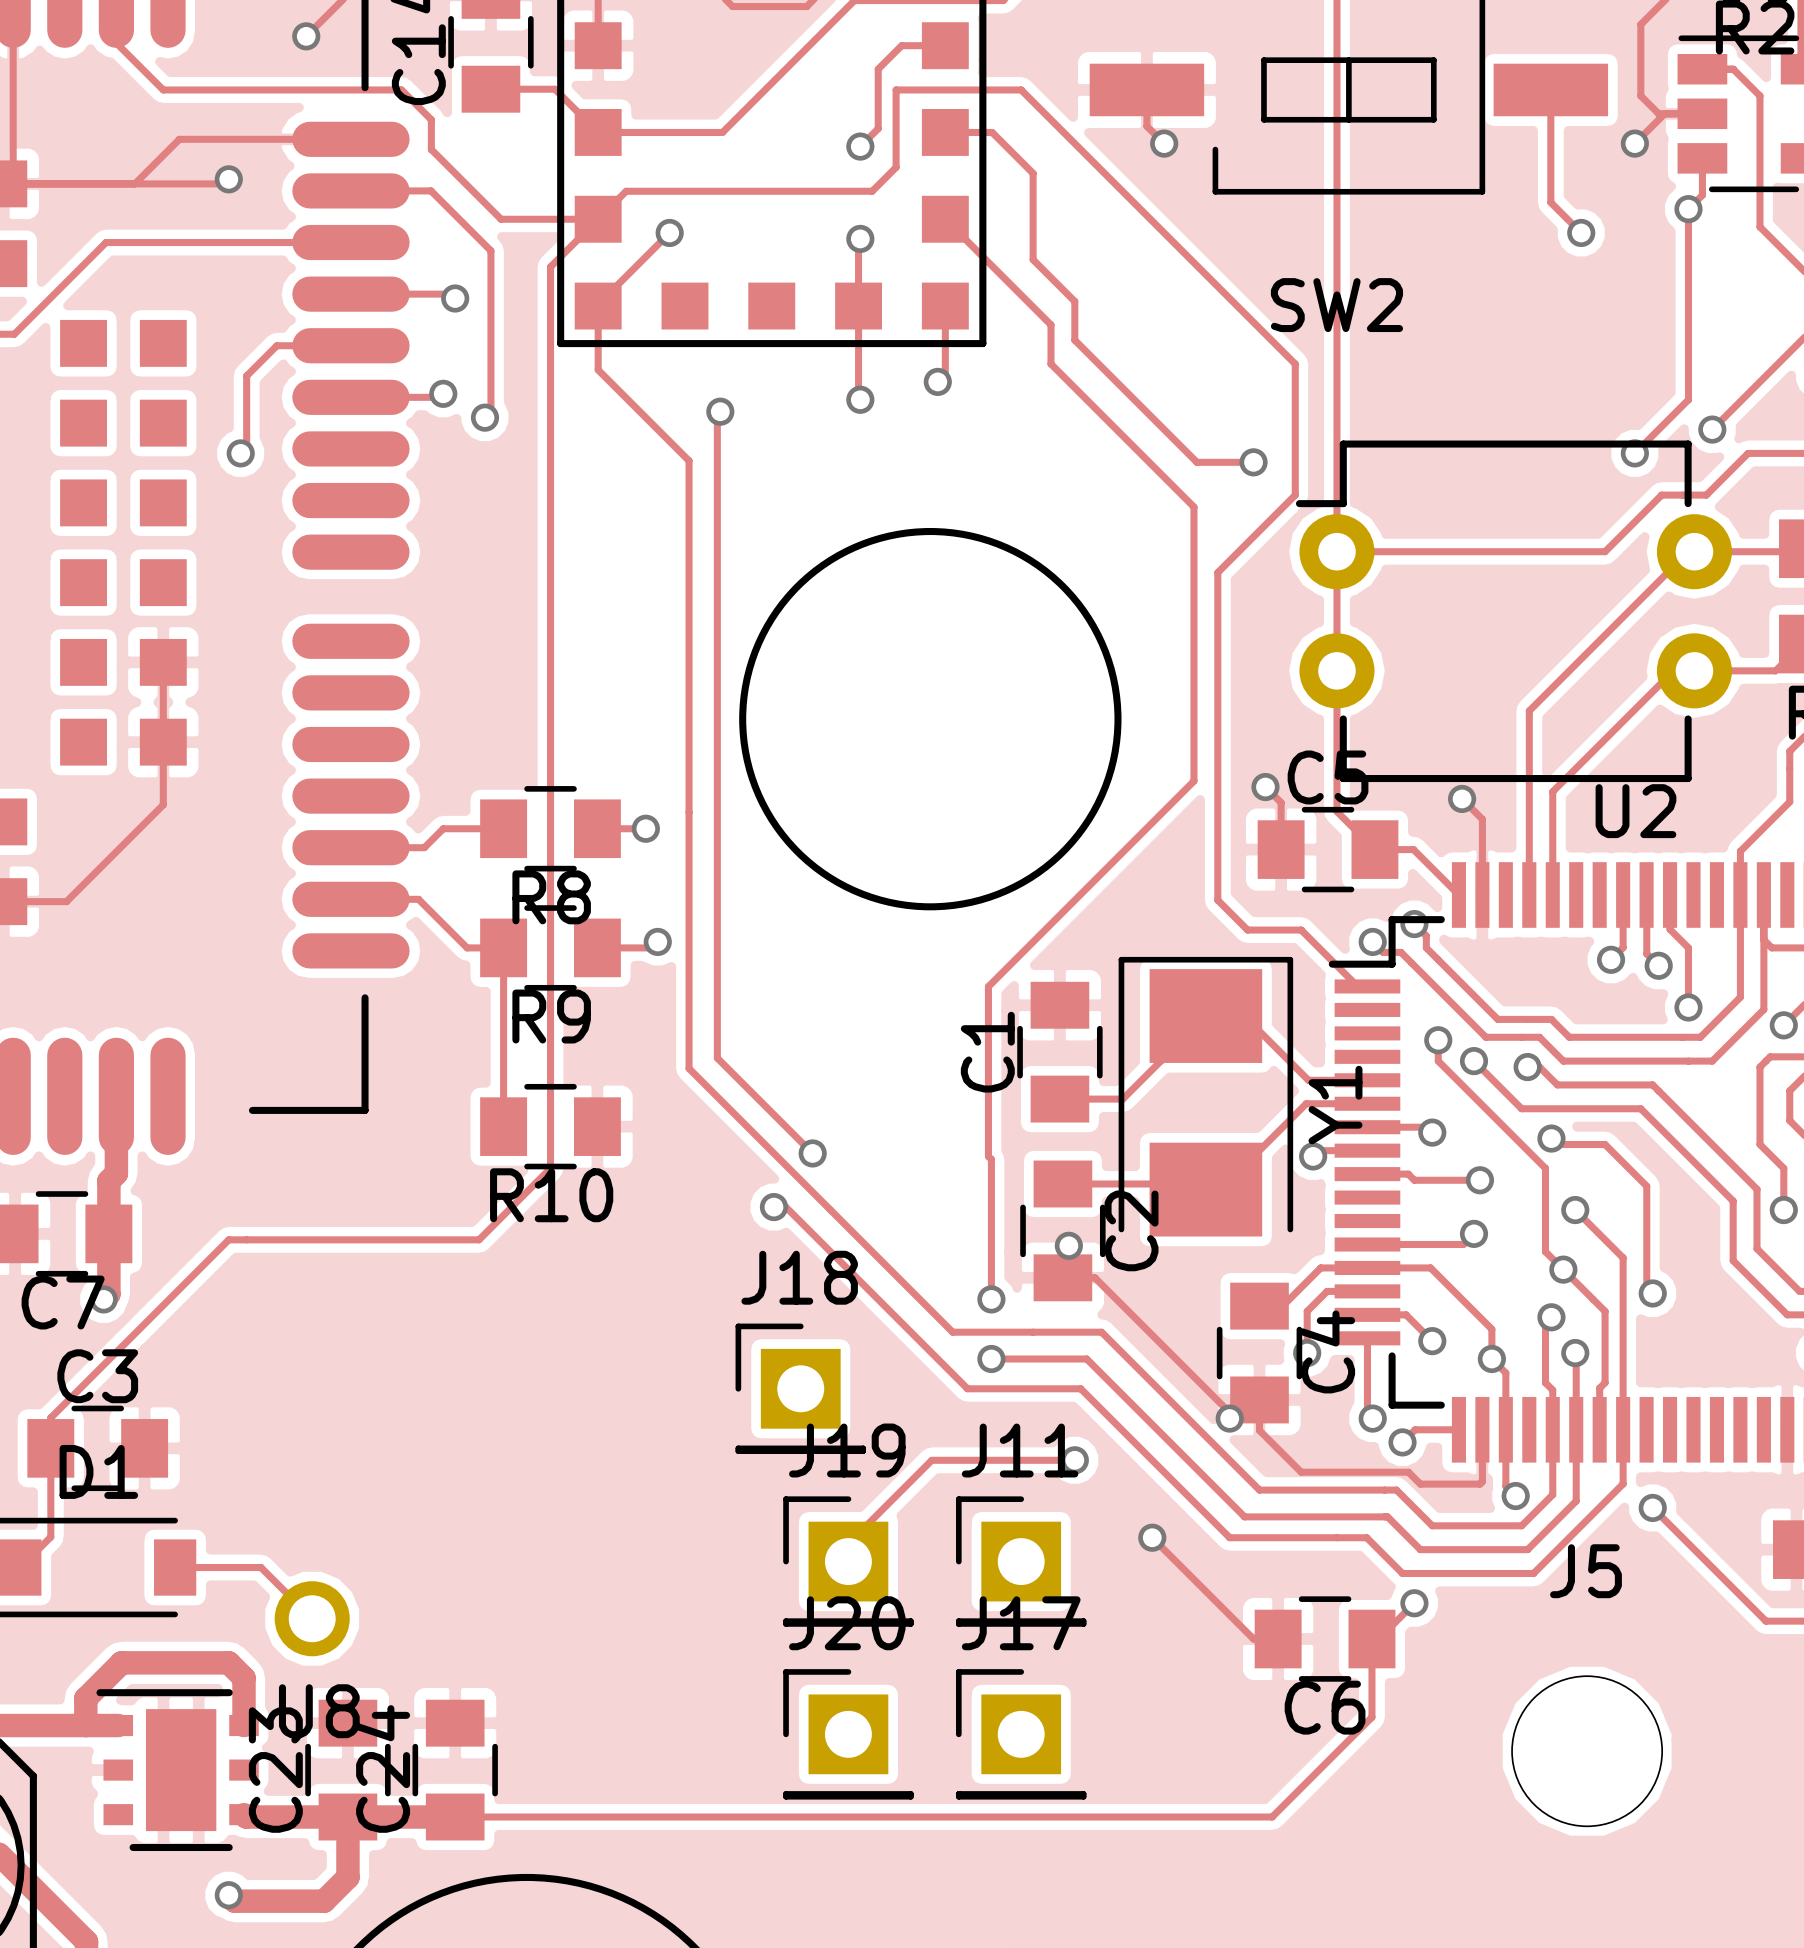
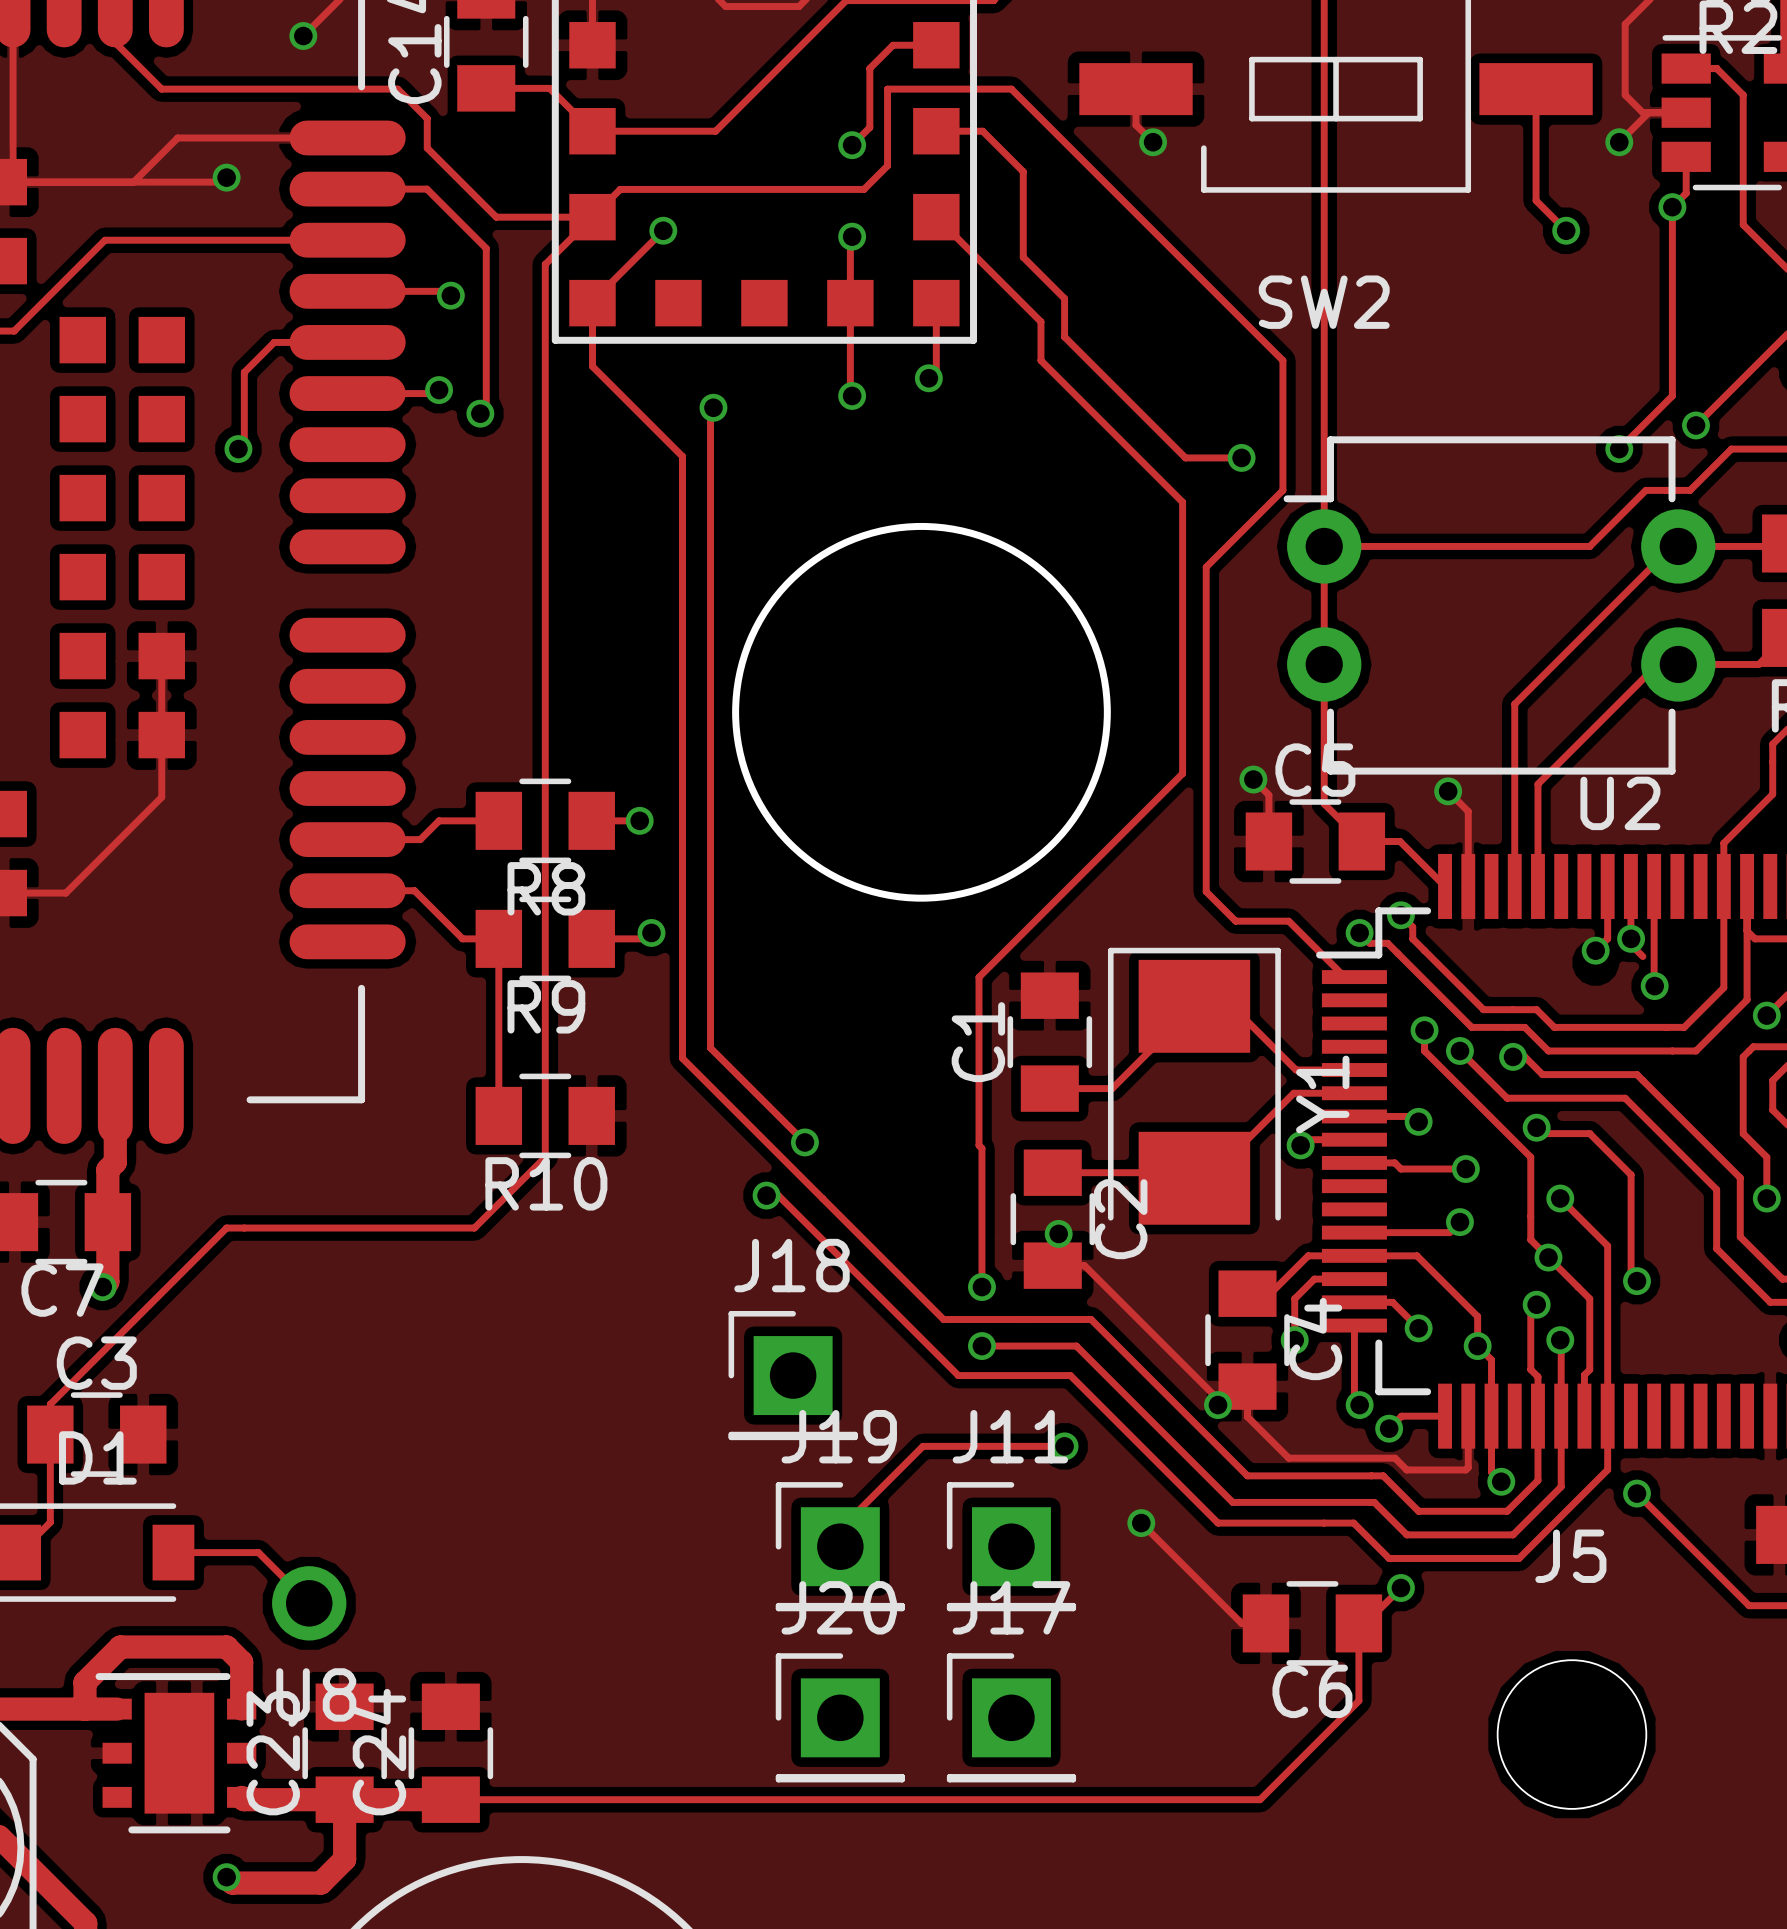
track: (1670, 929) (1688, 947) (1688, 1007) -> (1654, 920) (1654, 985)
via position: (1658, 965) -> (1631, 938)
via position: (1688, 1007) -> (1654, 986)

